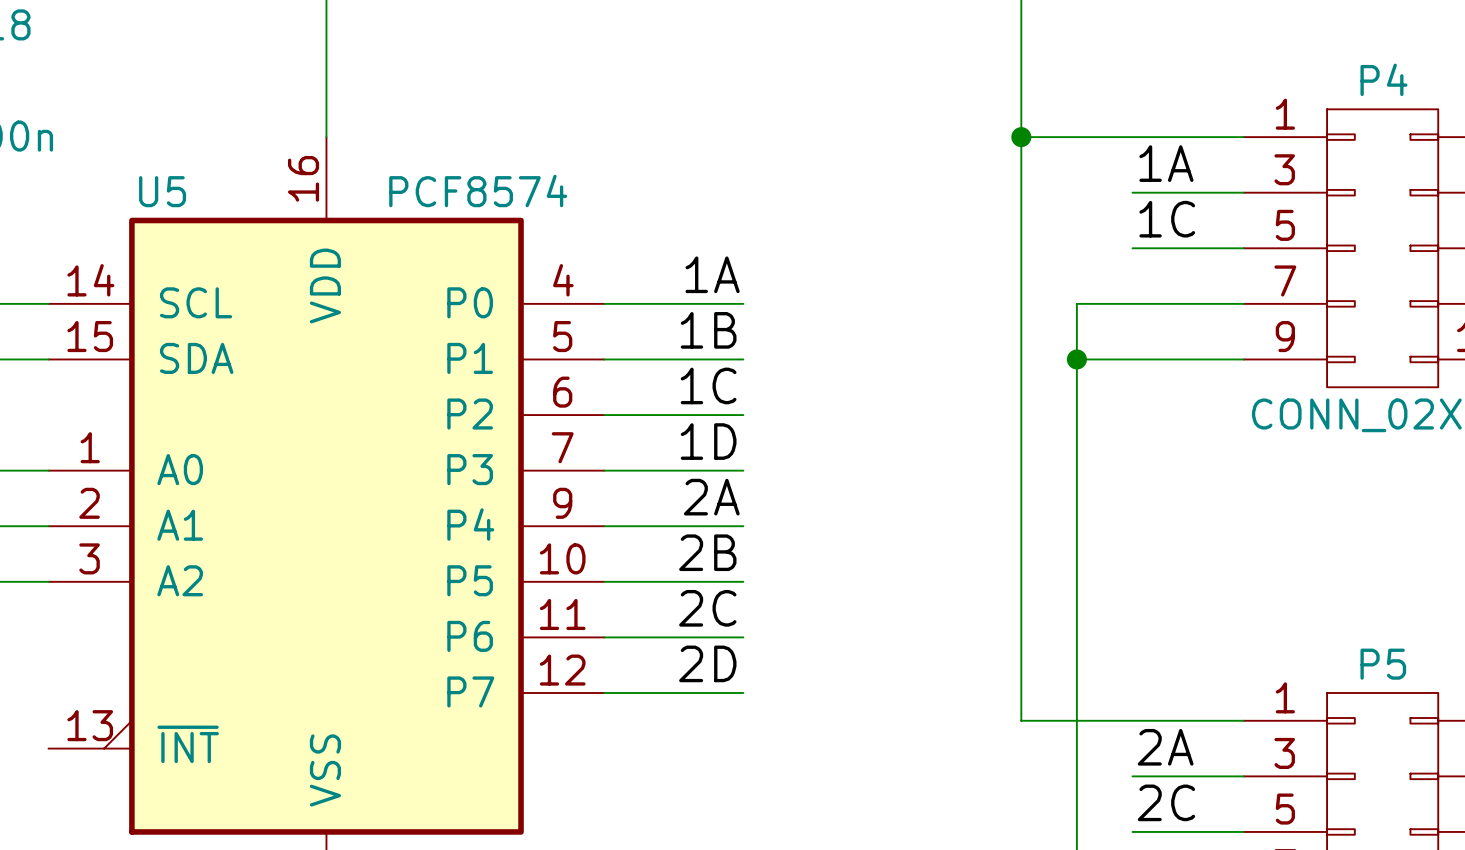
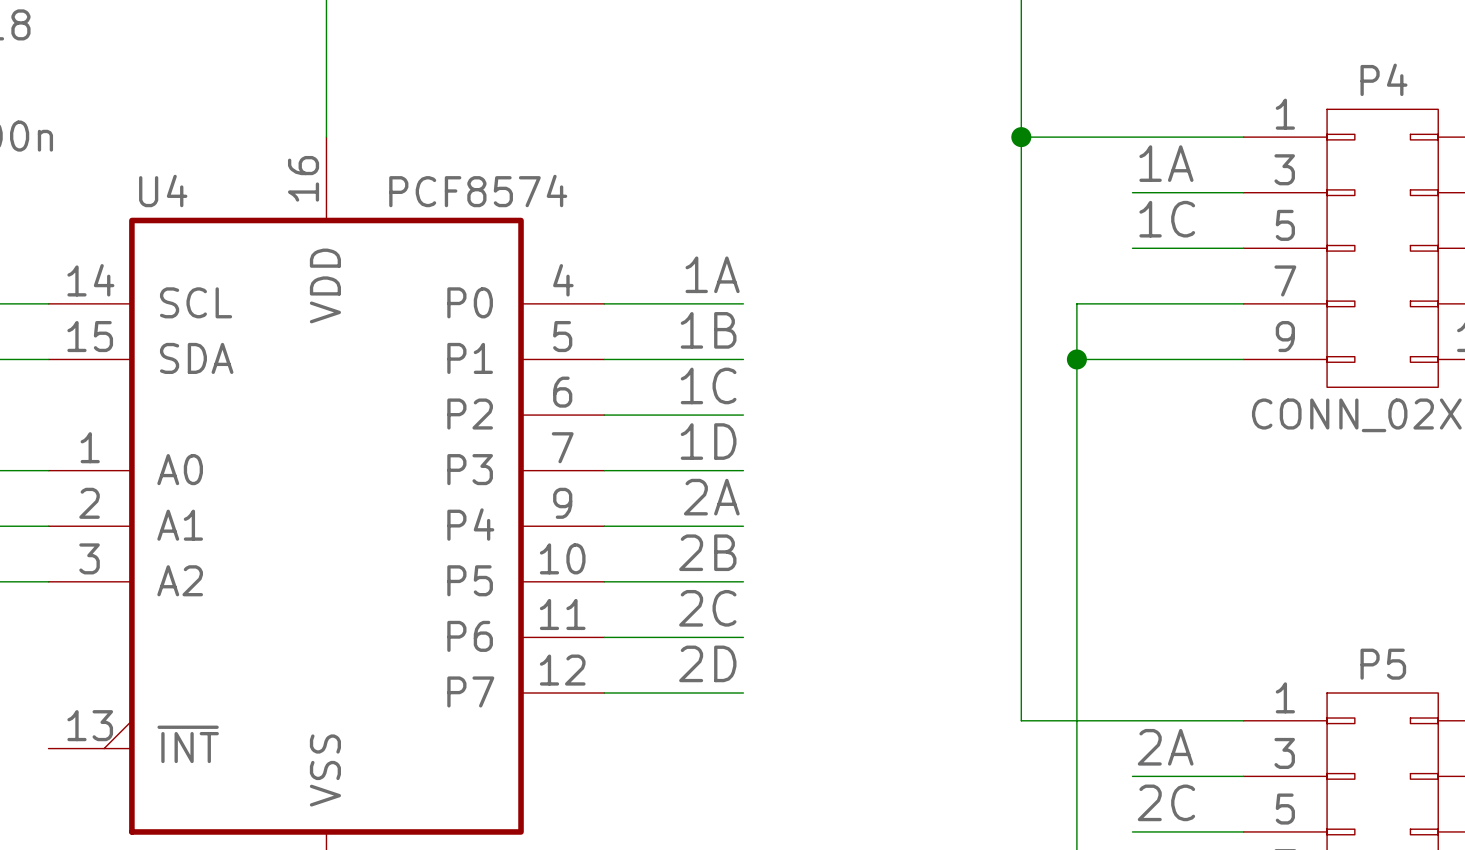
U5 name: U5 (162, 191) -> U4 (163, 191)

